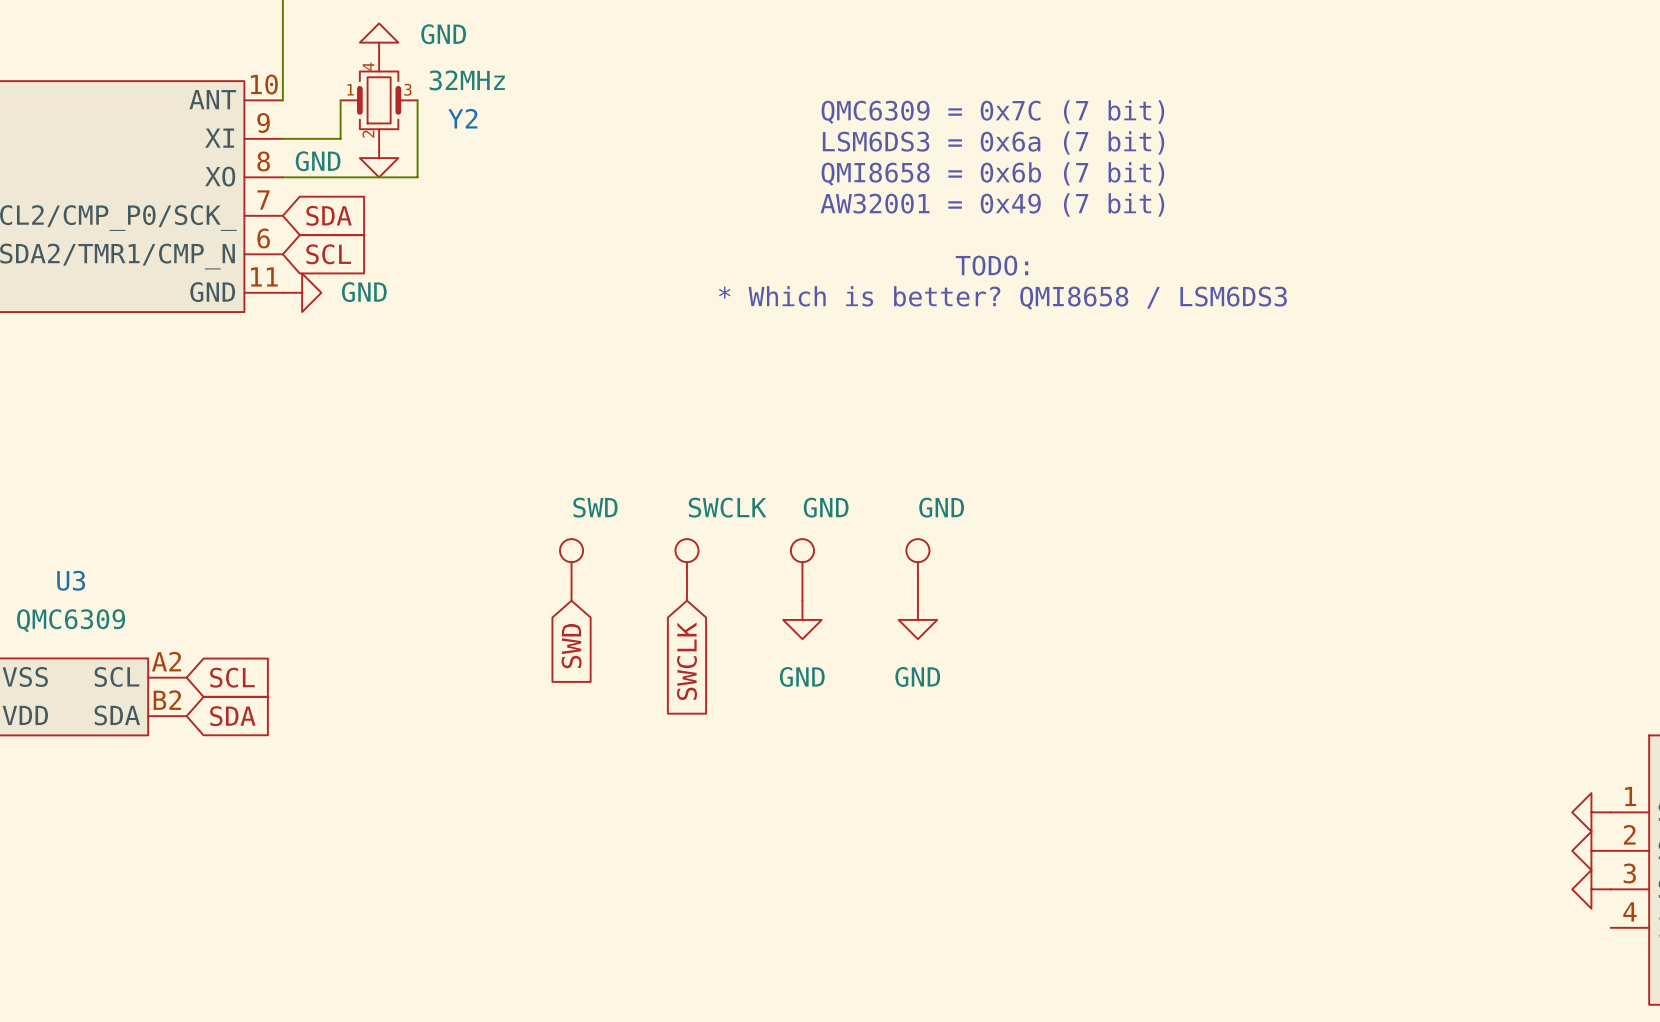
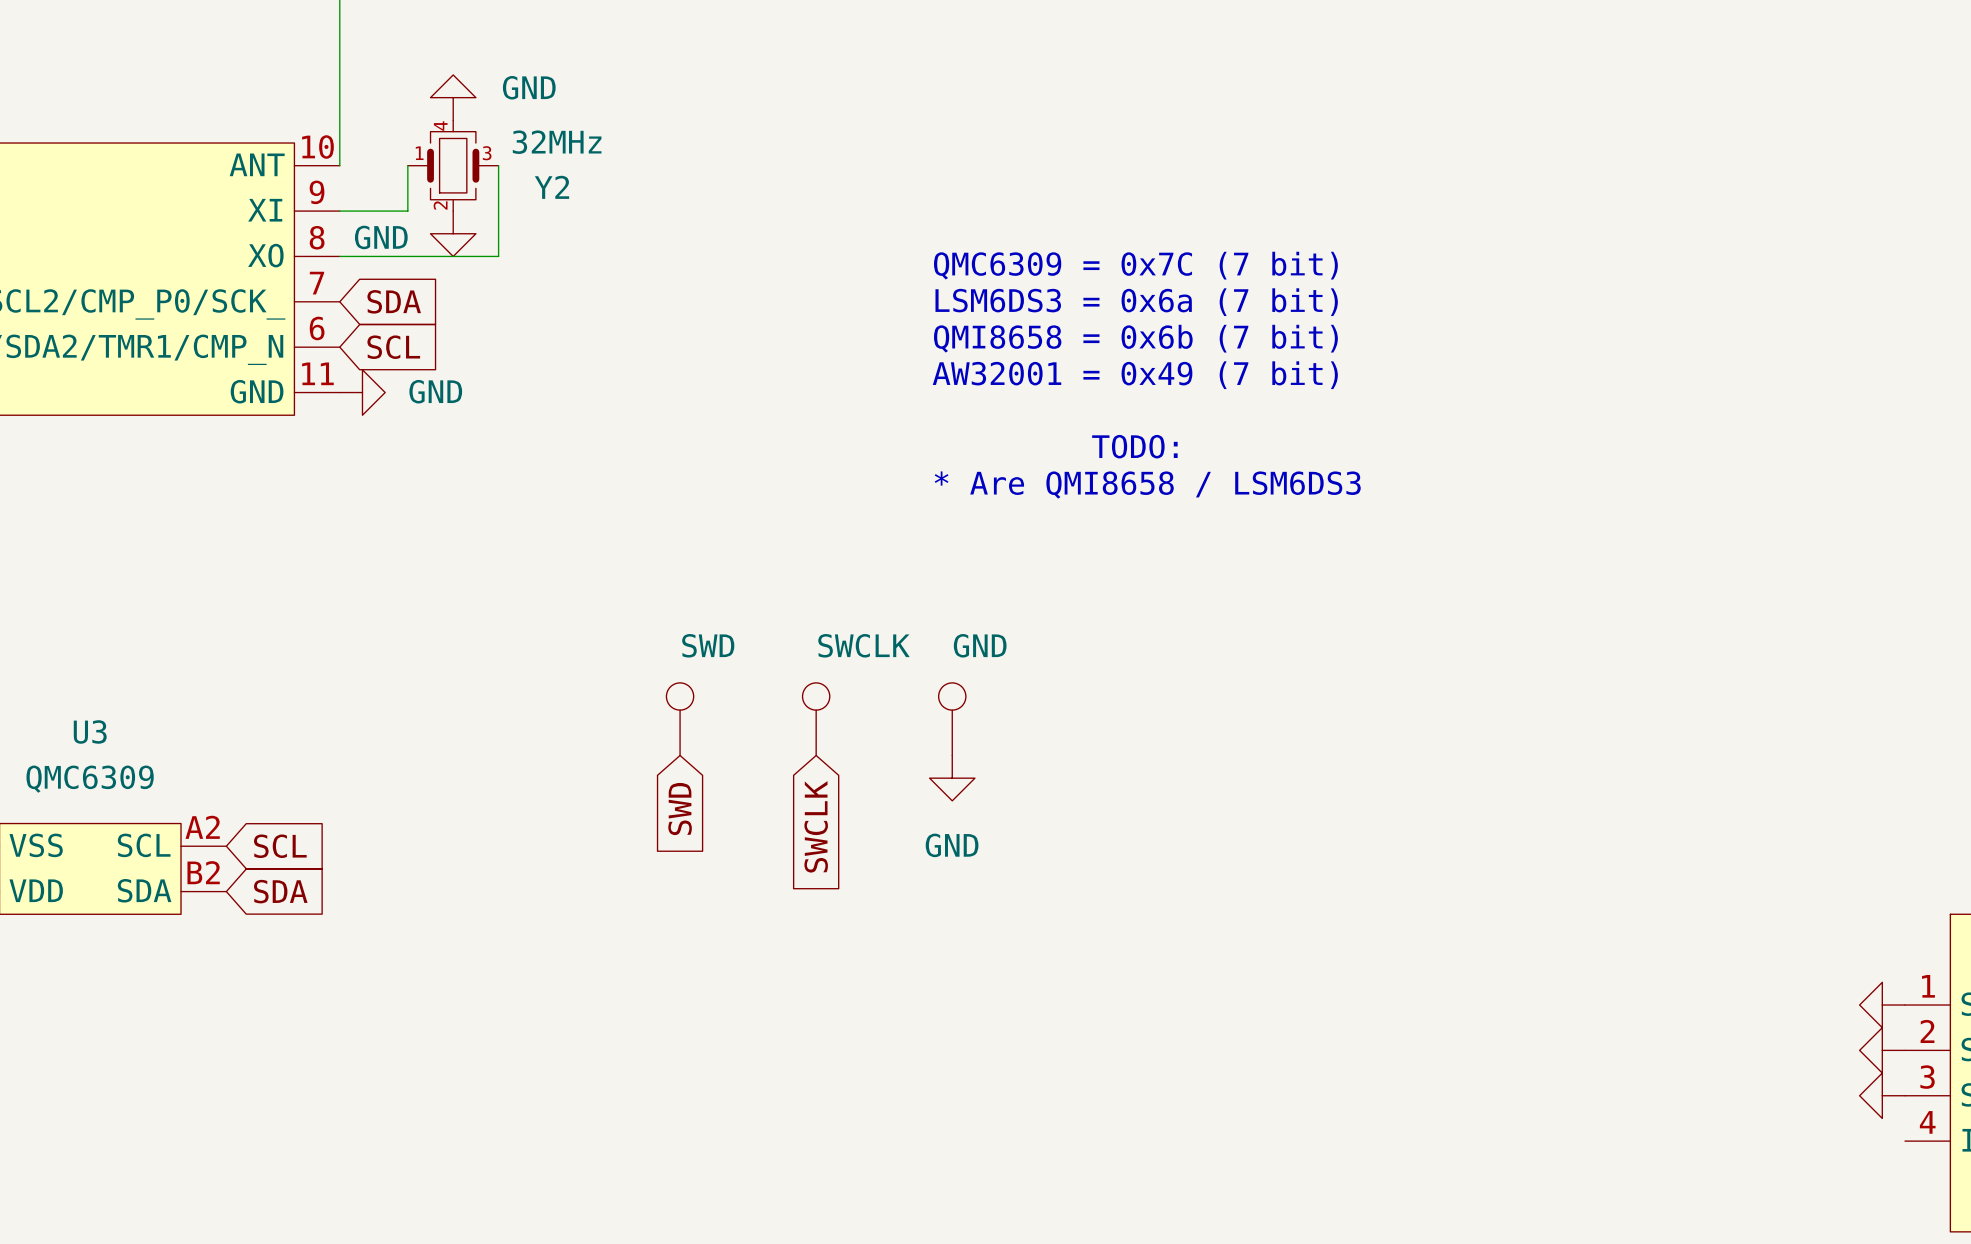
text position: QMC6309 = 0x7C (7 bit) (992, 112) -> QMC6309 = 0x7C (7 bit) (1135, 265)
text position: LSM6DS3 = 0x6a (7 bit) (993, 142) -> LSM6DS3 = 0x6a (7 bit) (1136, 302)
text position: QMI8658 = 0x6b (7 bit) (992, 173) -> QMI8658 = 0x6b (7 bit) (1135, 338)
text position: AW32001 = 0x49 (7 bit) (992, 204) -> AW32001 = 0x49 (7 bit) (1135, 375)
text position: TODO: (992, 265) -> TODO: (1134, 446)
text: * Which is better? QMI8658 / LSM6DS3 (1002, 297) -> none
text: none -> * Are QMI8658 / LSM6DS3 (1147, 485)
part: GND (917, 569) -> none
power symbol: GND (917, 619) -> none

